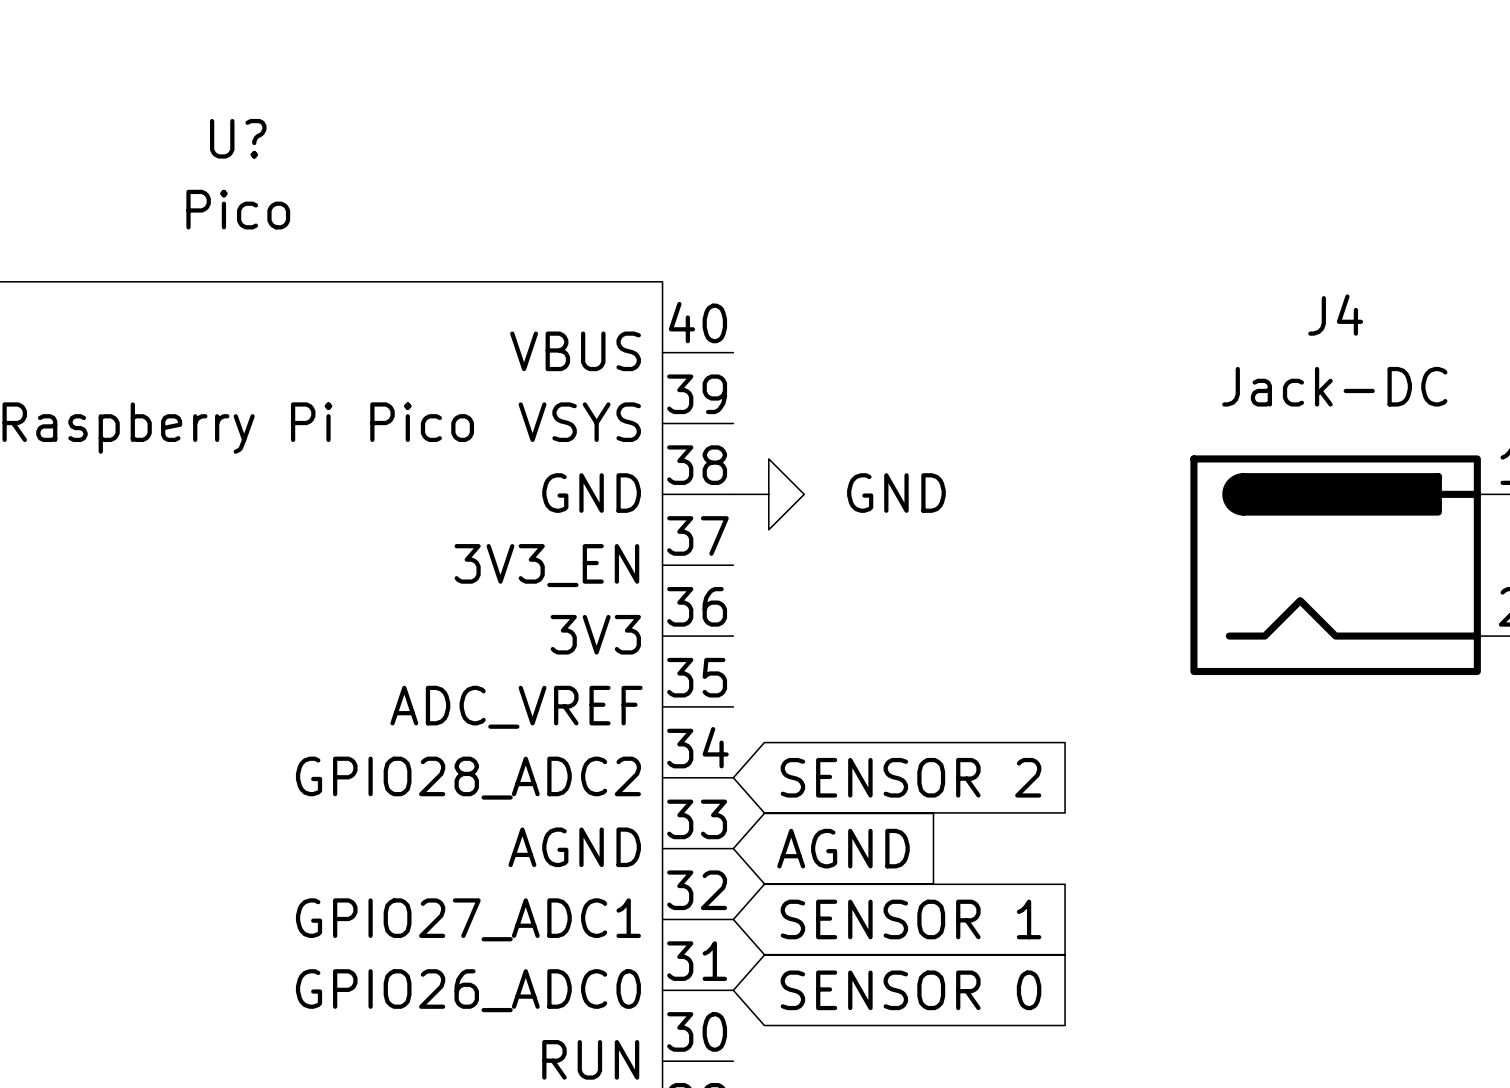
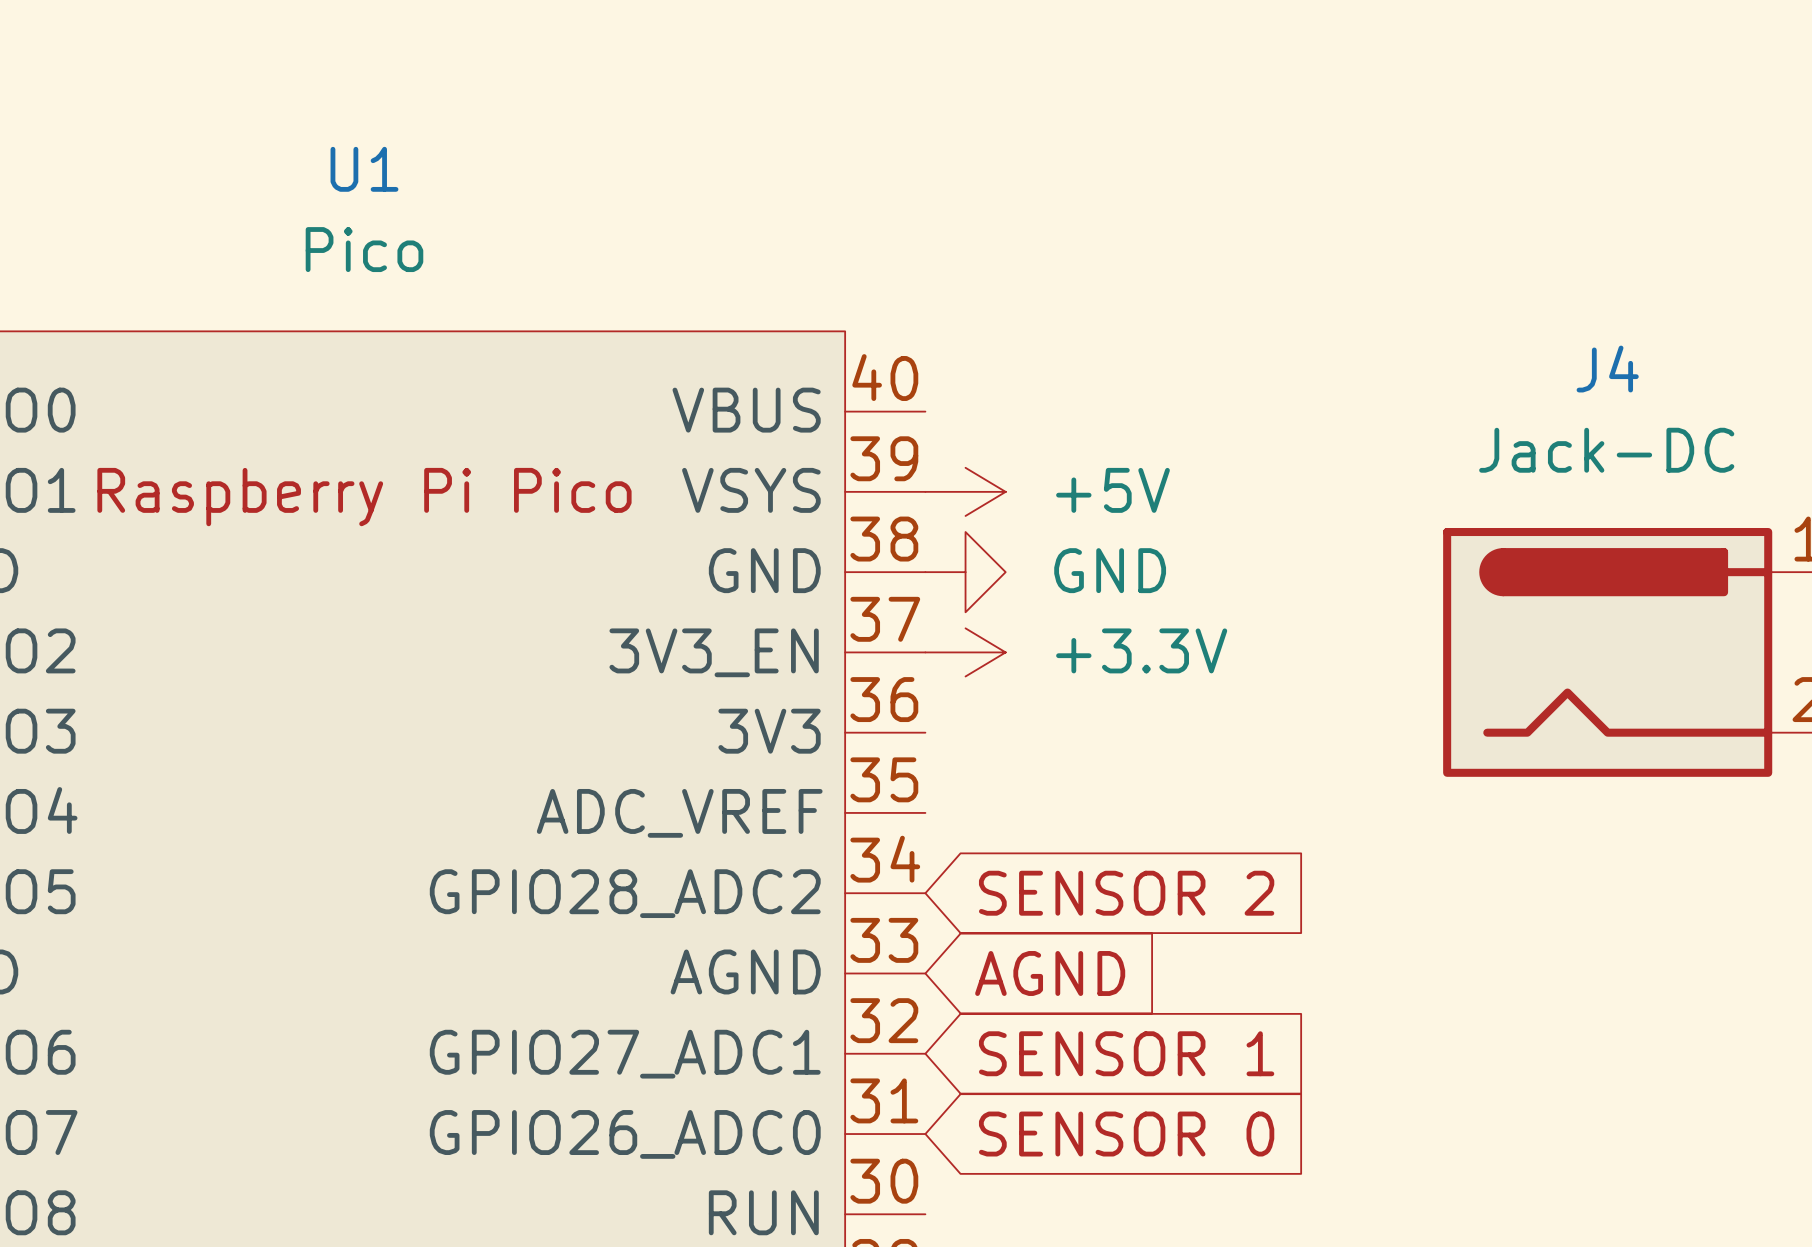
U? name: U? (238, 138) -> U1 (364, 169)
power symbol: none -> +5V (965, 491)
power symbol: none -> +3.3V (965, 652)

